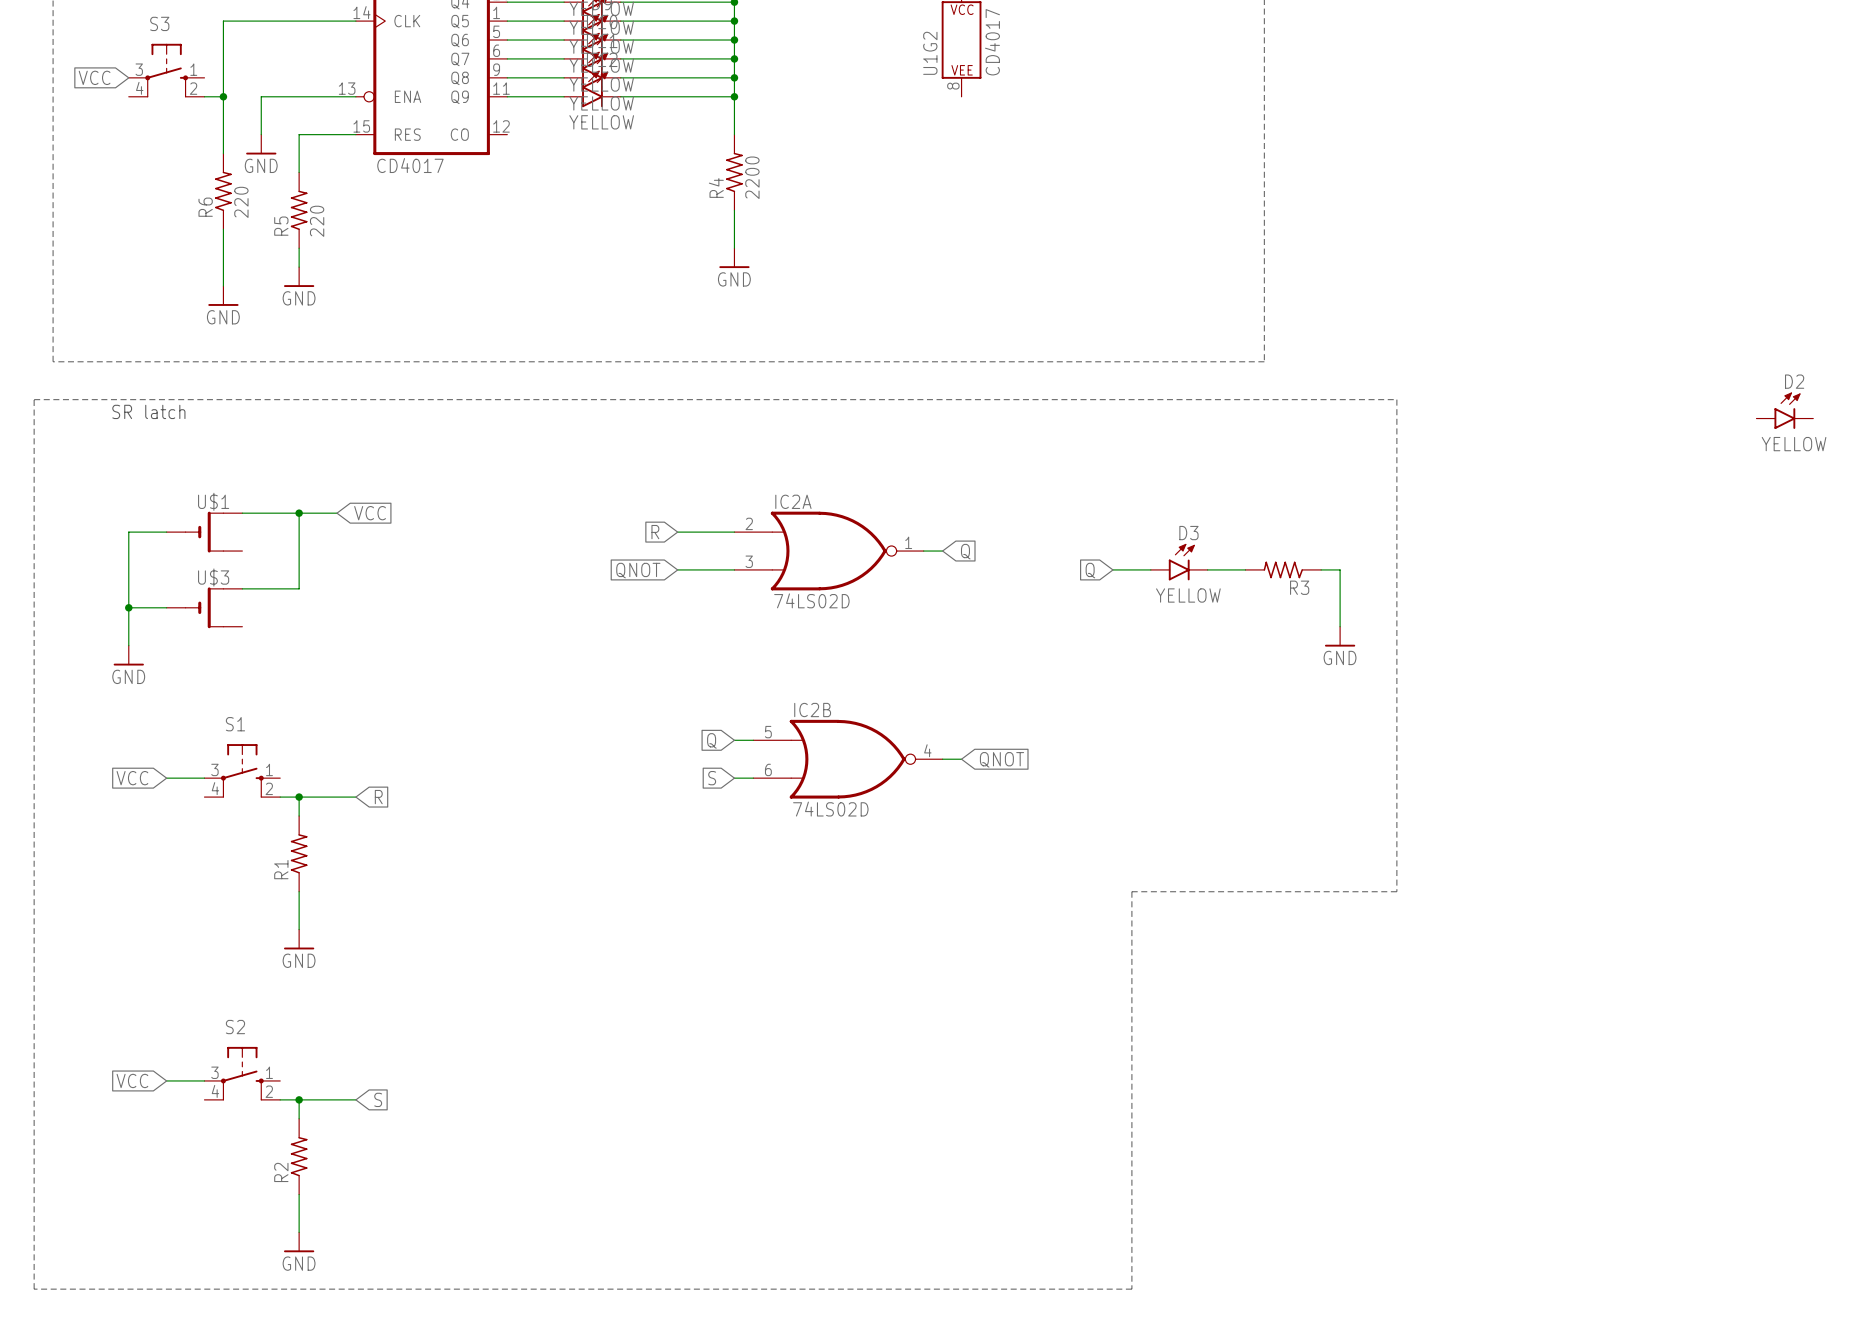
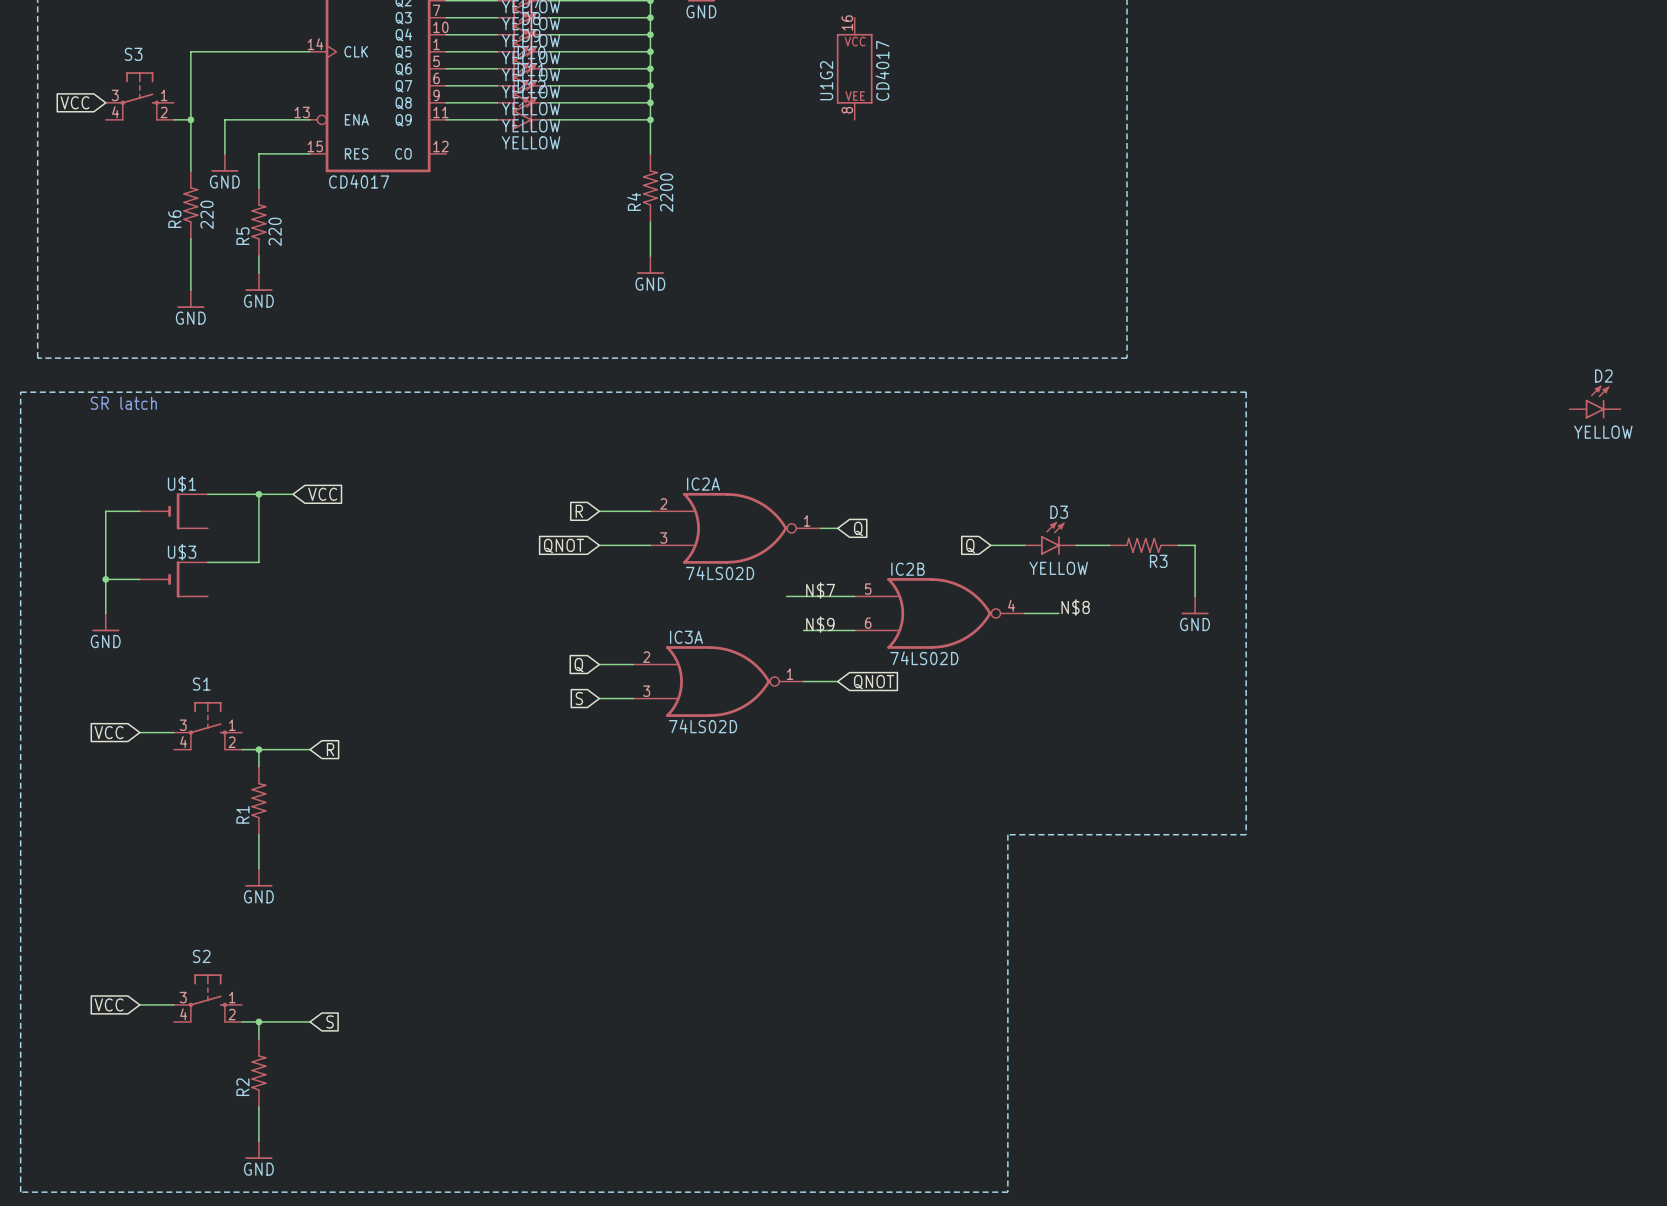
label: none -> N$7 (820, 590)
wire: none -> (786, 596) (854, 596)
label: none -> N$8 (1075, 607)
wire: none -> (1024, 613) (1058, 613)
label: none -> N$9 (820, 624)
wire: none -> (803, 630) (854, 630)
wire: none -> (599, 664) (633, 664)
IC3A: none -> 74LS02D (718, 681)
wire: none -> (803, 681) (837, 681)
wire: none -> (599, 698) (633, 698)
global label position: Q (711, 740) -> Q (579, 665)
IC2B position: (848, 759) -> (939, 613)
wire: (942, 759) (961, 759) -> none
global label position: QNOT (1002, 759) -> QNOT (874, 682)
global label position: S (712, 778) -> S (579, 698)
wire: (734, 778) (753, 778) -> none

